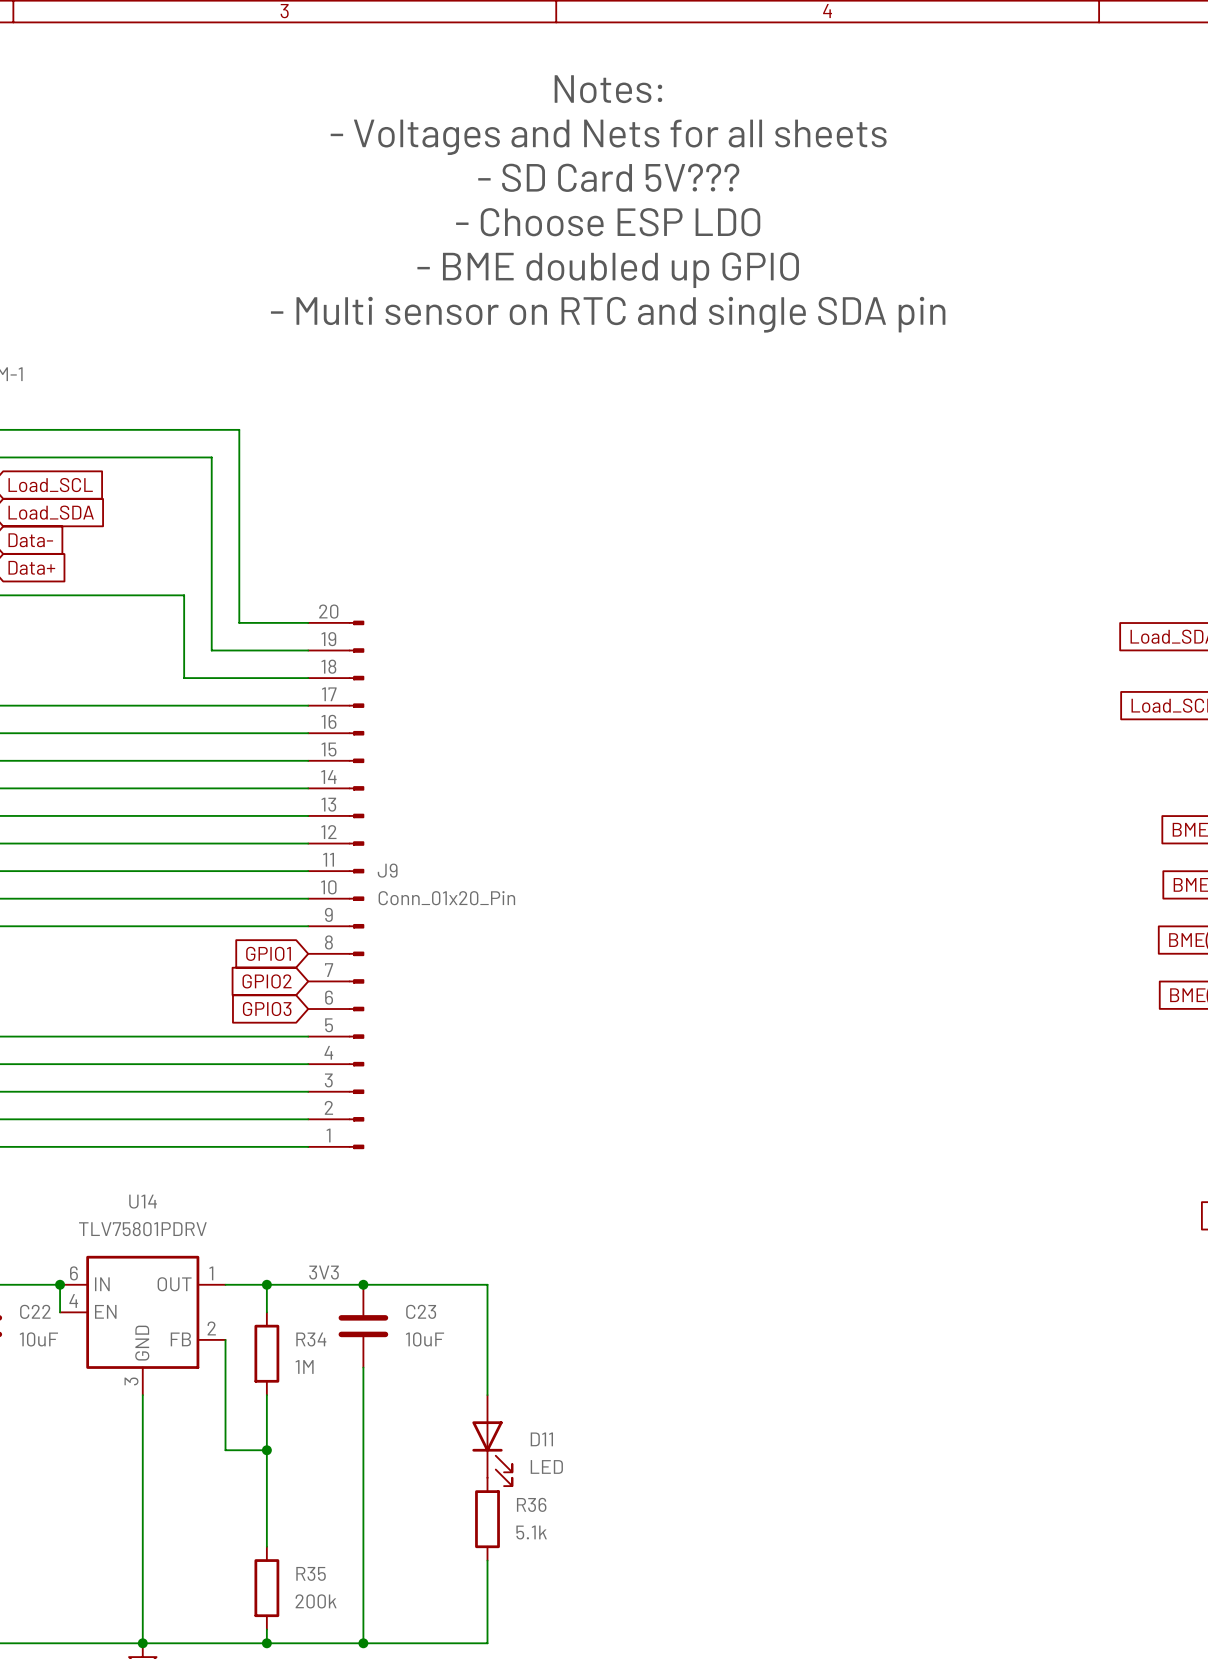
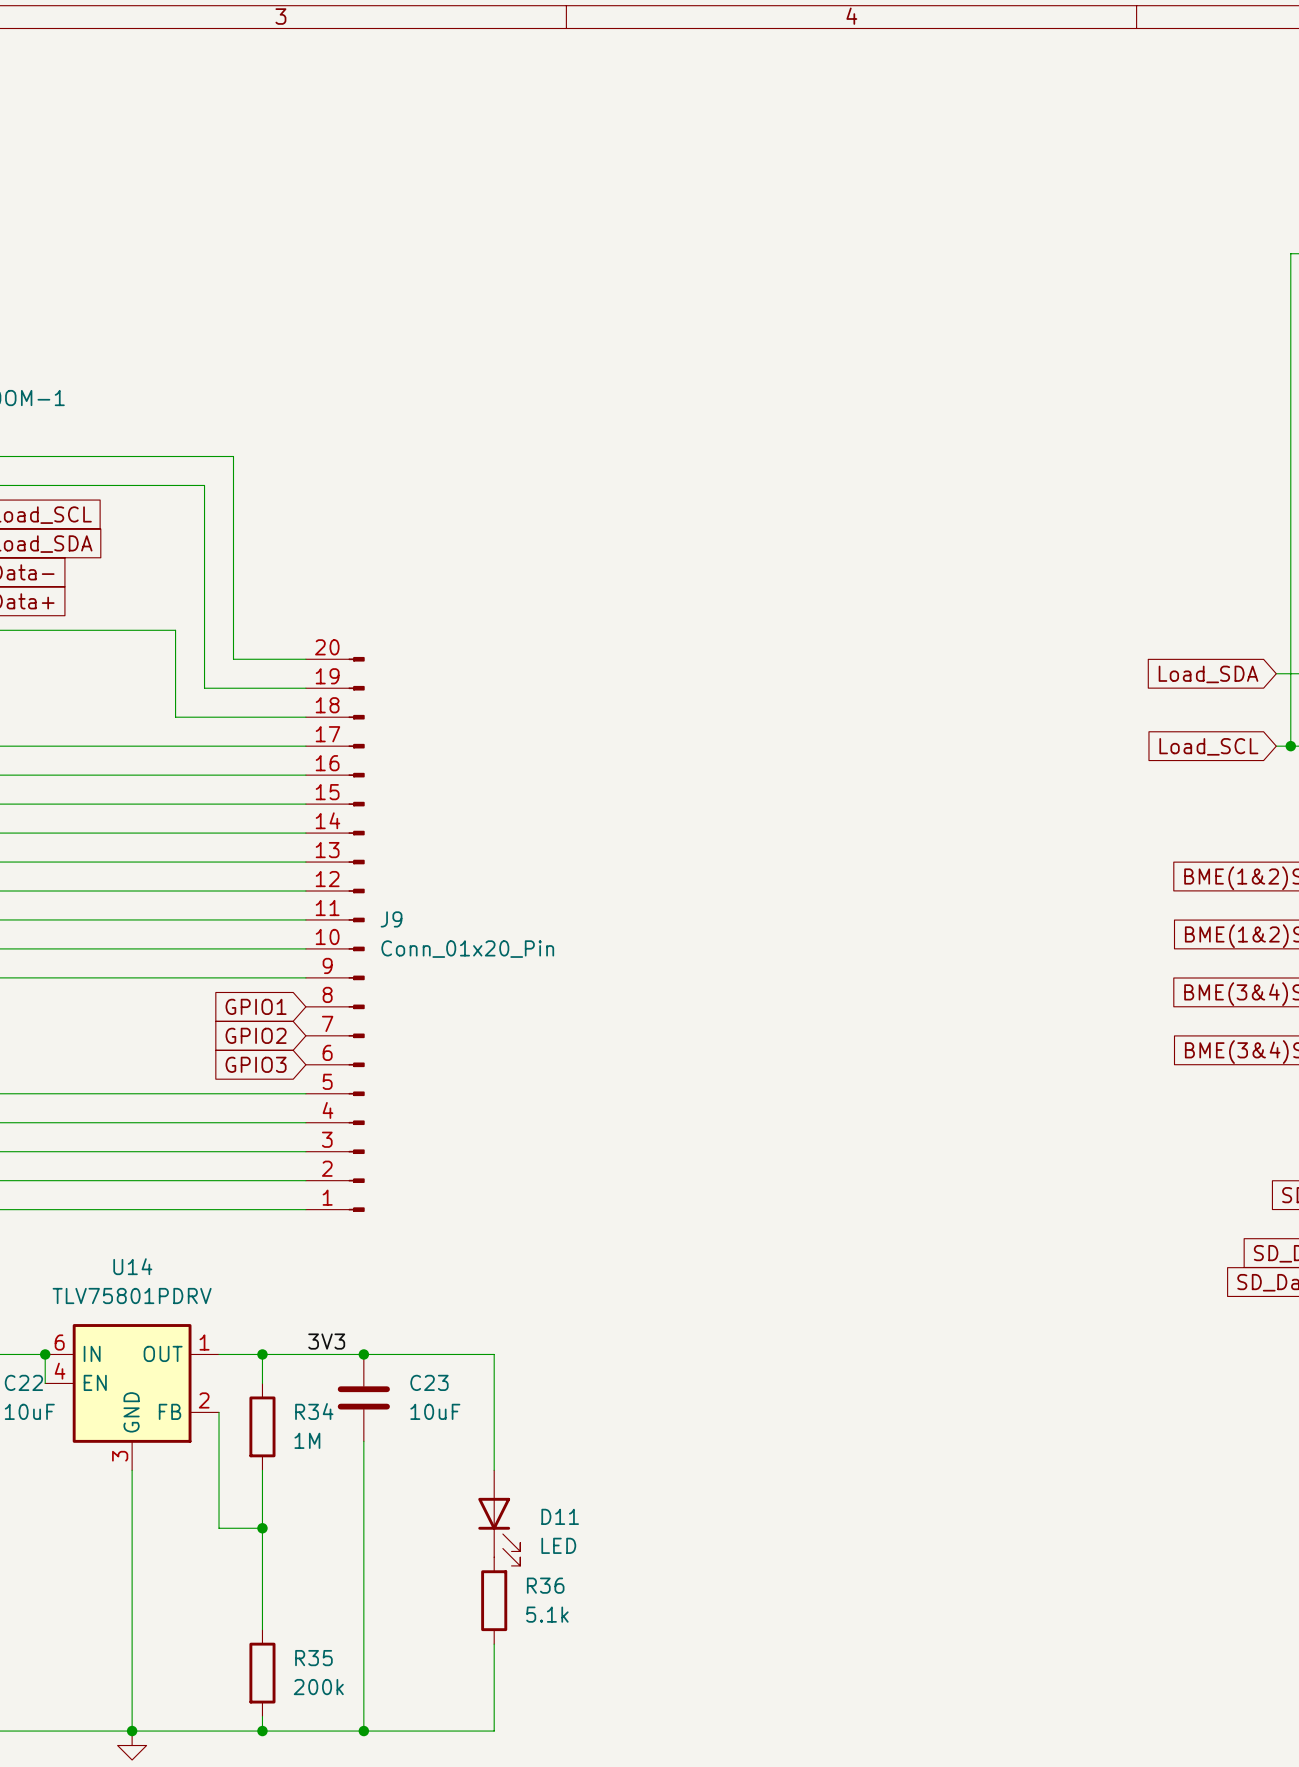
text: Notes: (608, 89) -> none
text: - Voltages and Nets for all sheets (608, 137) -> none
text: - SD Card 5V??? (608, 177) -> none
text: - Choose ESP LDO (608, 222) -> none
text: - BME doubled up GPIO (608, 270) -> none
text: - Multi sensor on RTC and single SDA pin (608, 314) -> none

